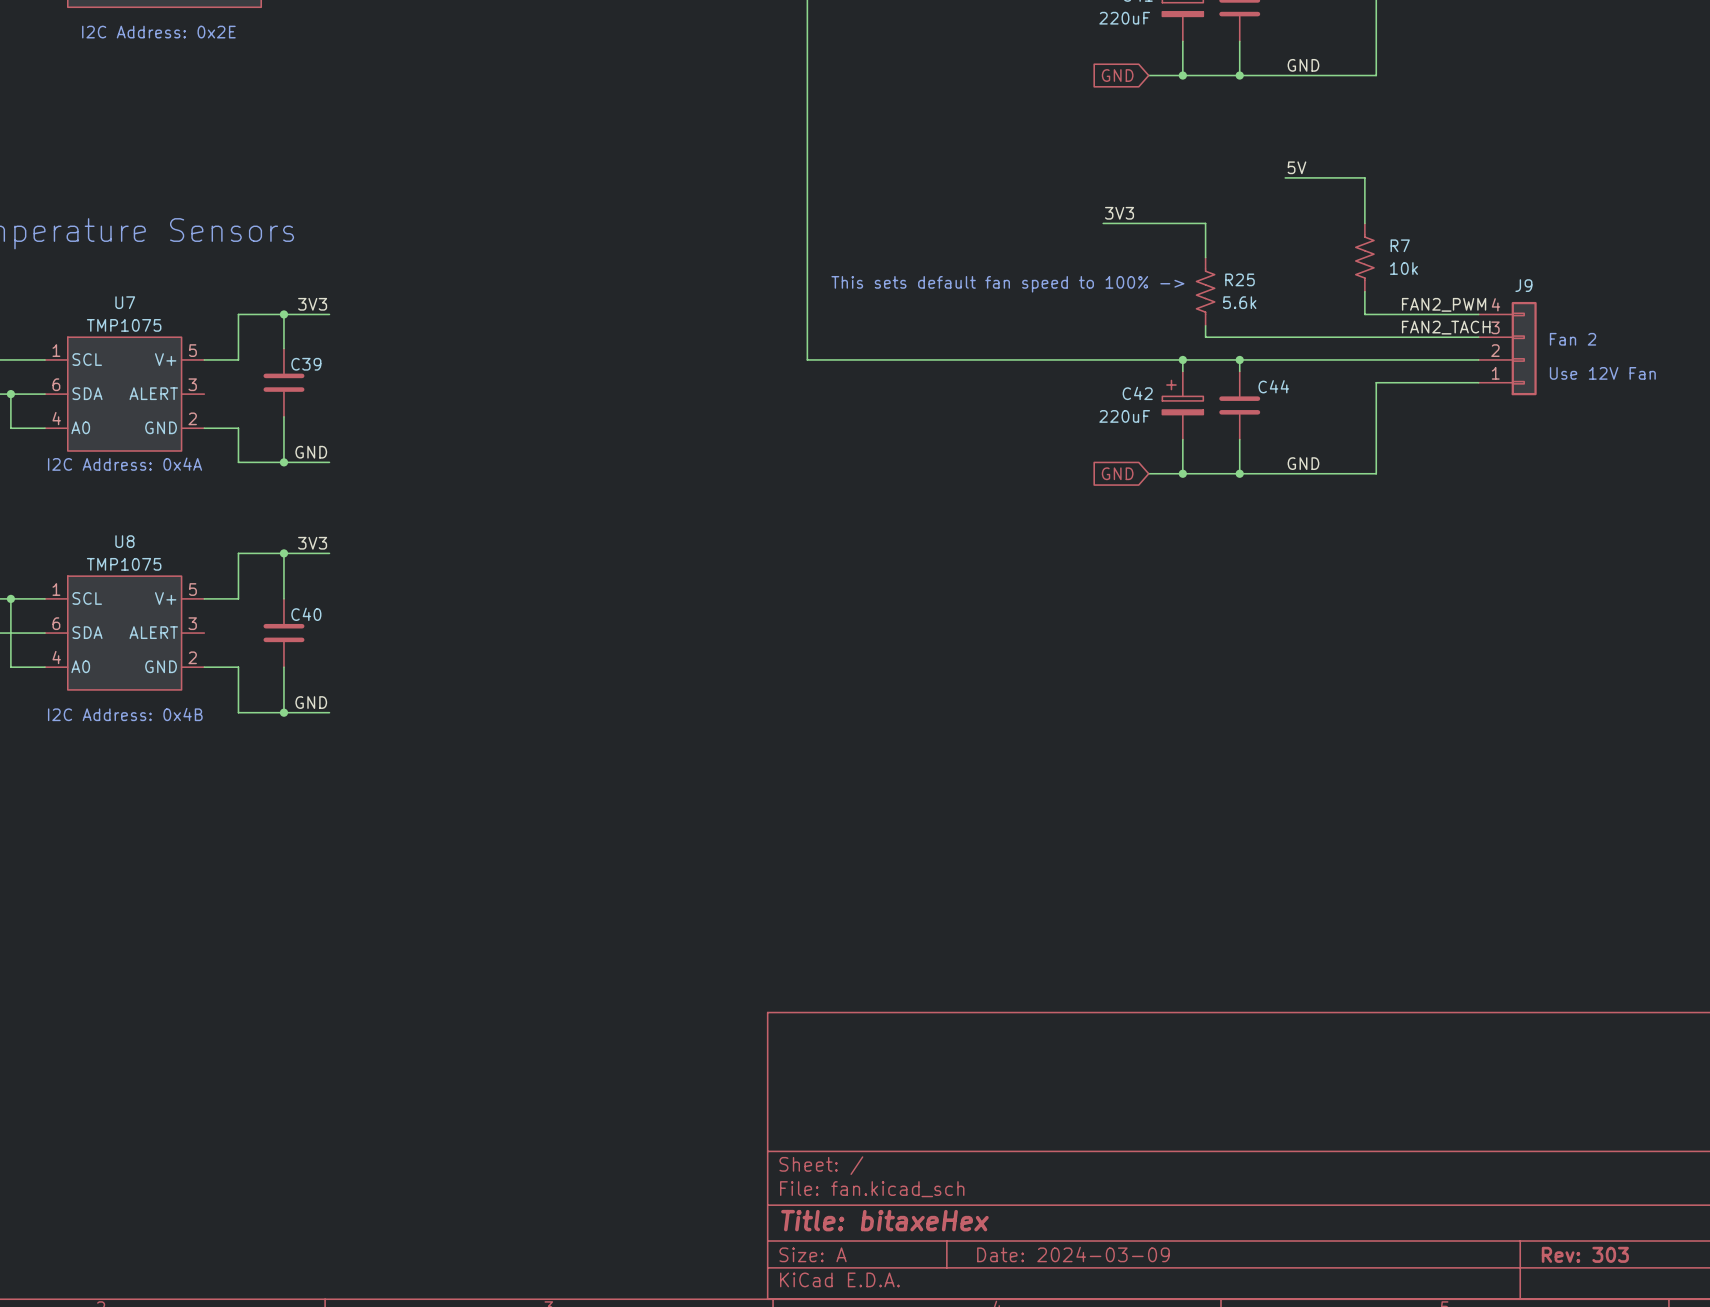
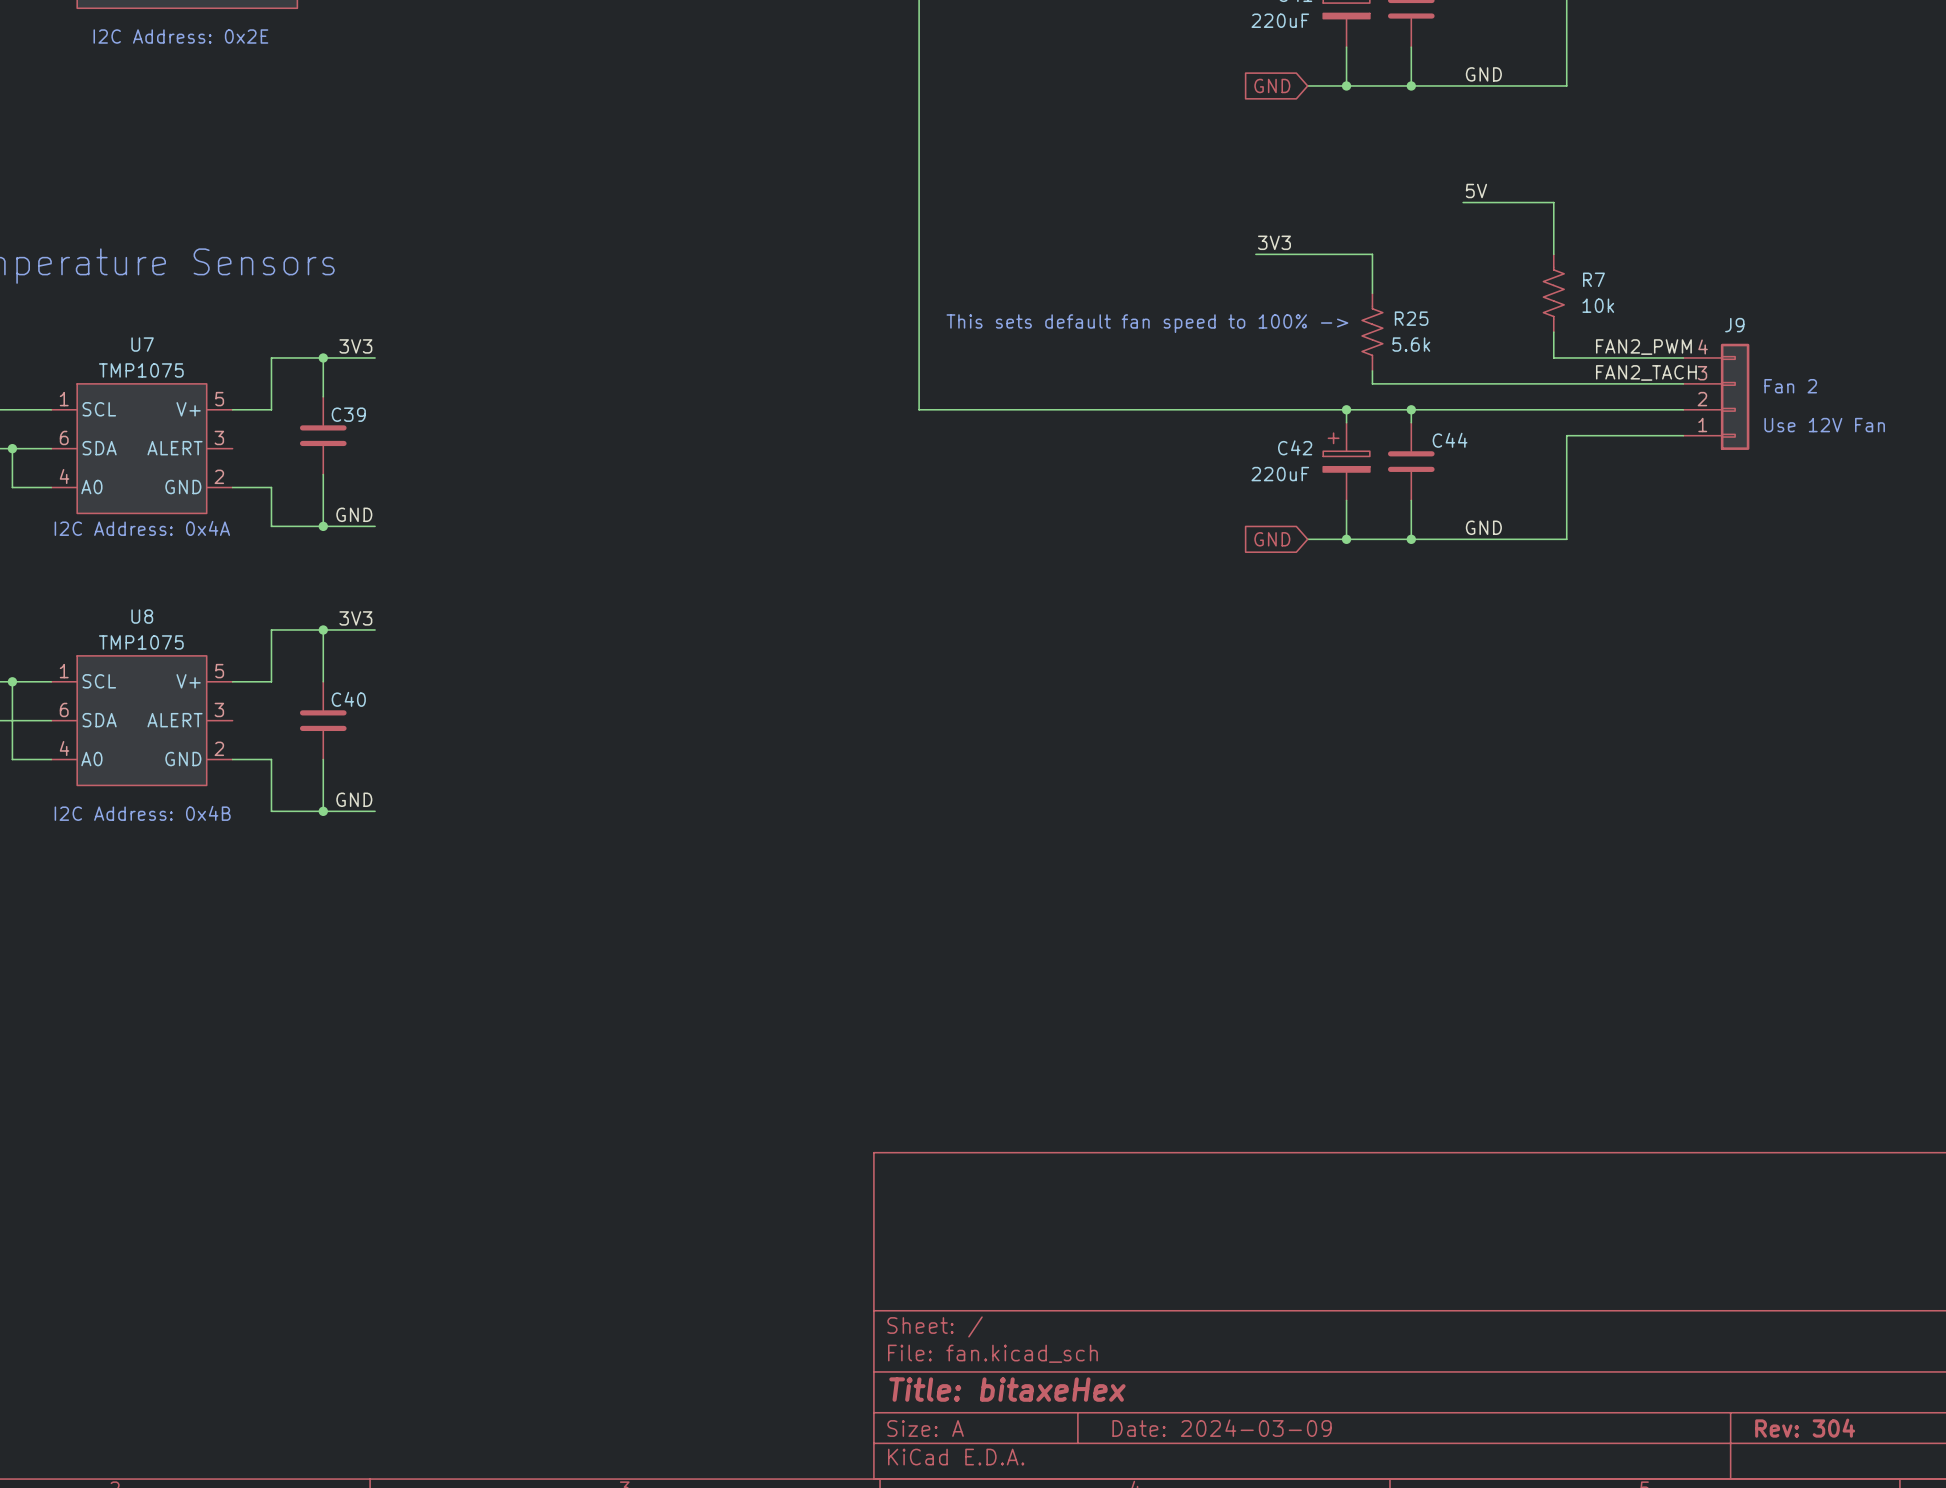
title block: Rev: 303 (1585, 1254) -> Rev: 304 (1805, 1428)

